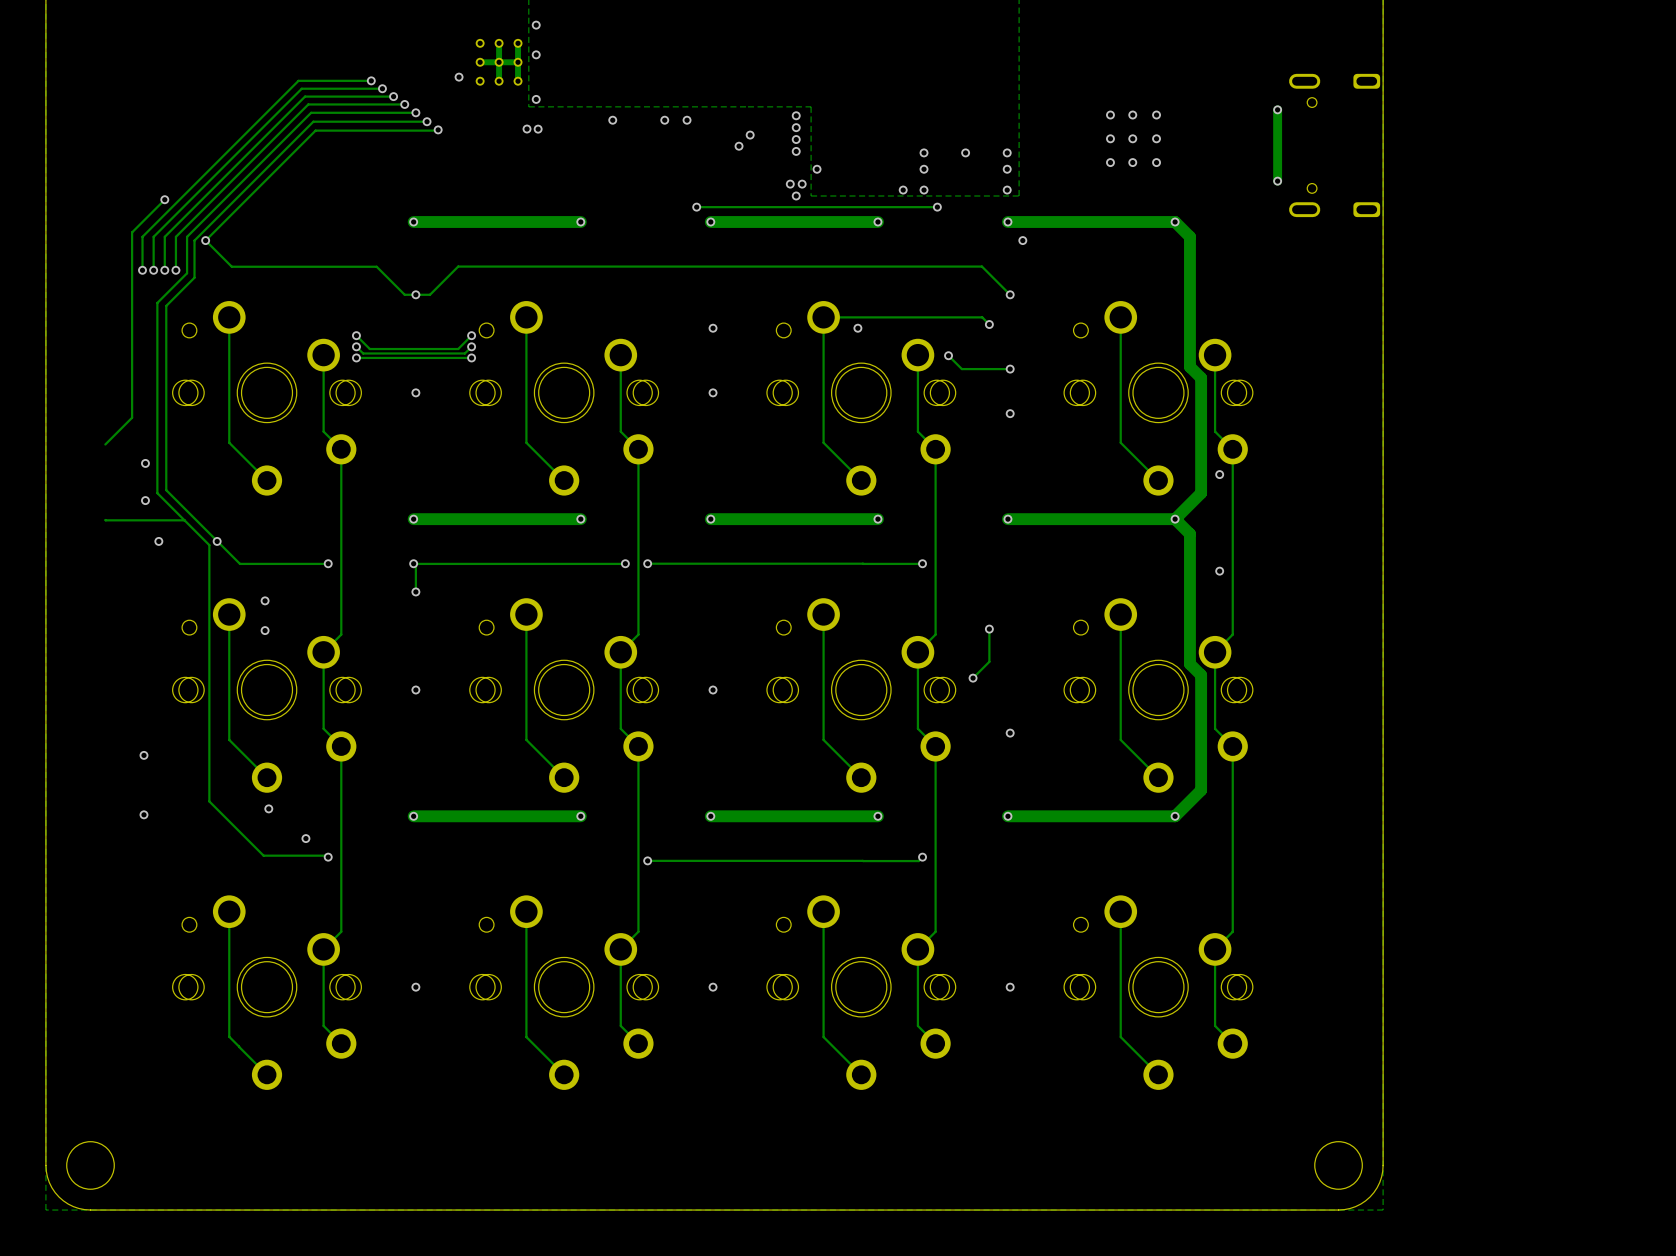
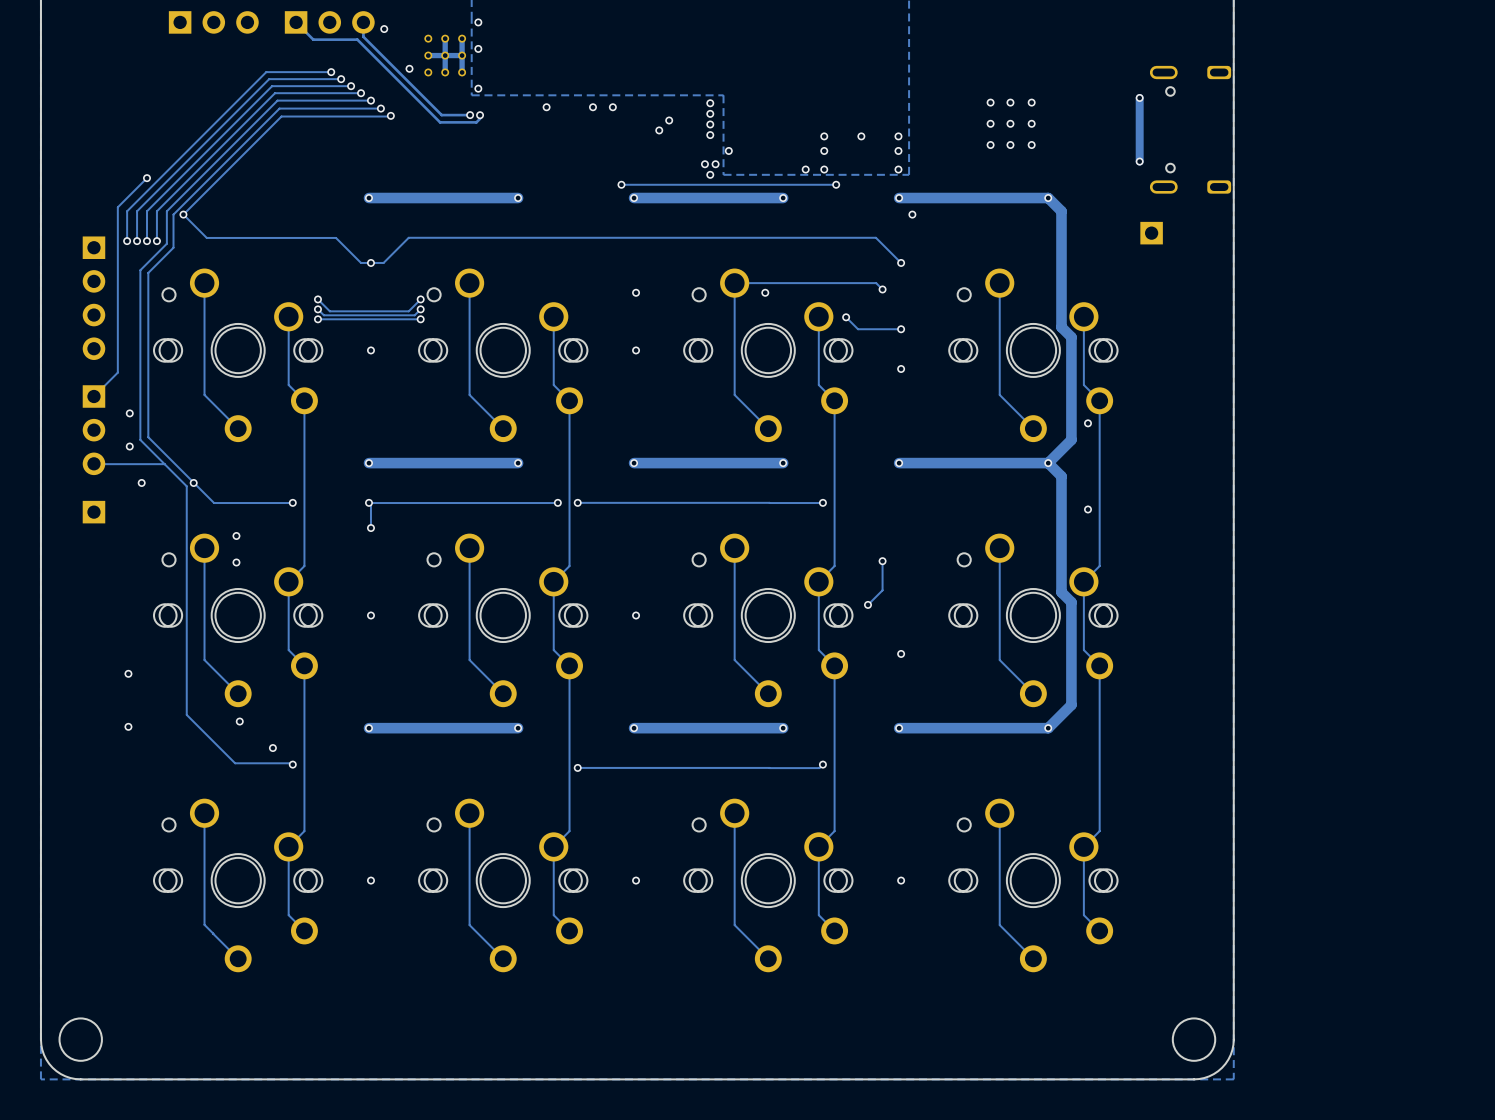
part: none -> (213, 22)
track: none -> (296, 22) (313, 39) (357, 39) (440, 122) (476, 122) (480, 118) (480, 115)
part: none -> (329, 22)
track: none -> (363, 22) (363, 36) (441, 115) (470, 115)
via: none -> (384, 29)
part: none -> (1151, 233)
part: none -> (93, 298)
part: none -> (93, 430)
part: none -> (93, 512)

